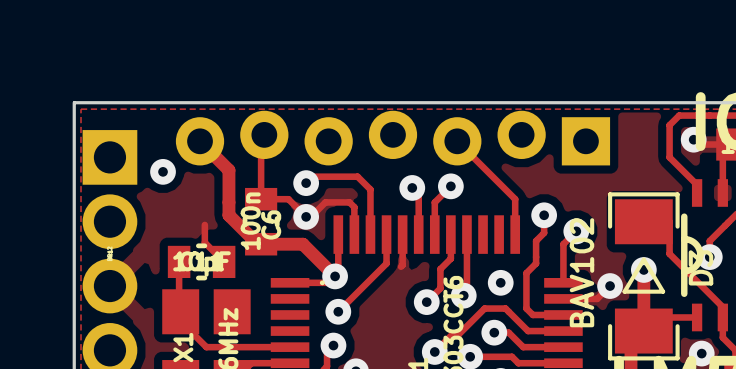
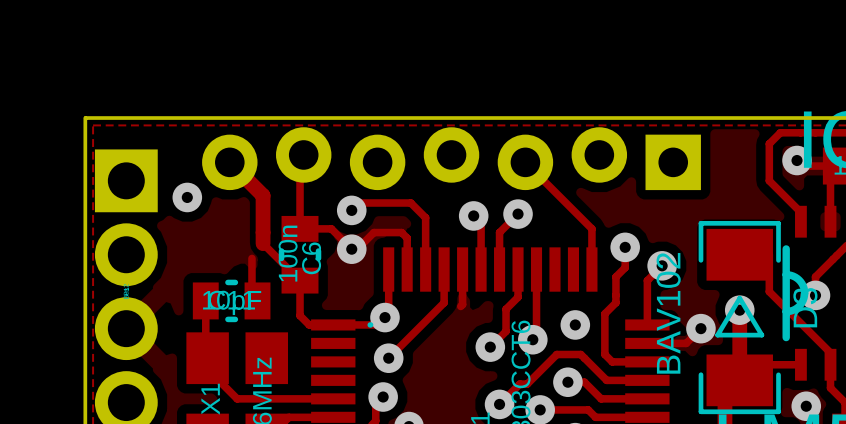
track: (228, 212) (228, 215) (257, 244) (302, 244) (335, 276) -> (263, 243) (300, 280) (300, 315) (309, 324) (333, 324)
track: (204, 224) (204, 242) (219, 257) -> (251, 258) (251, 295)

